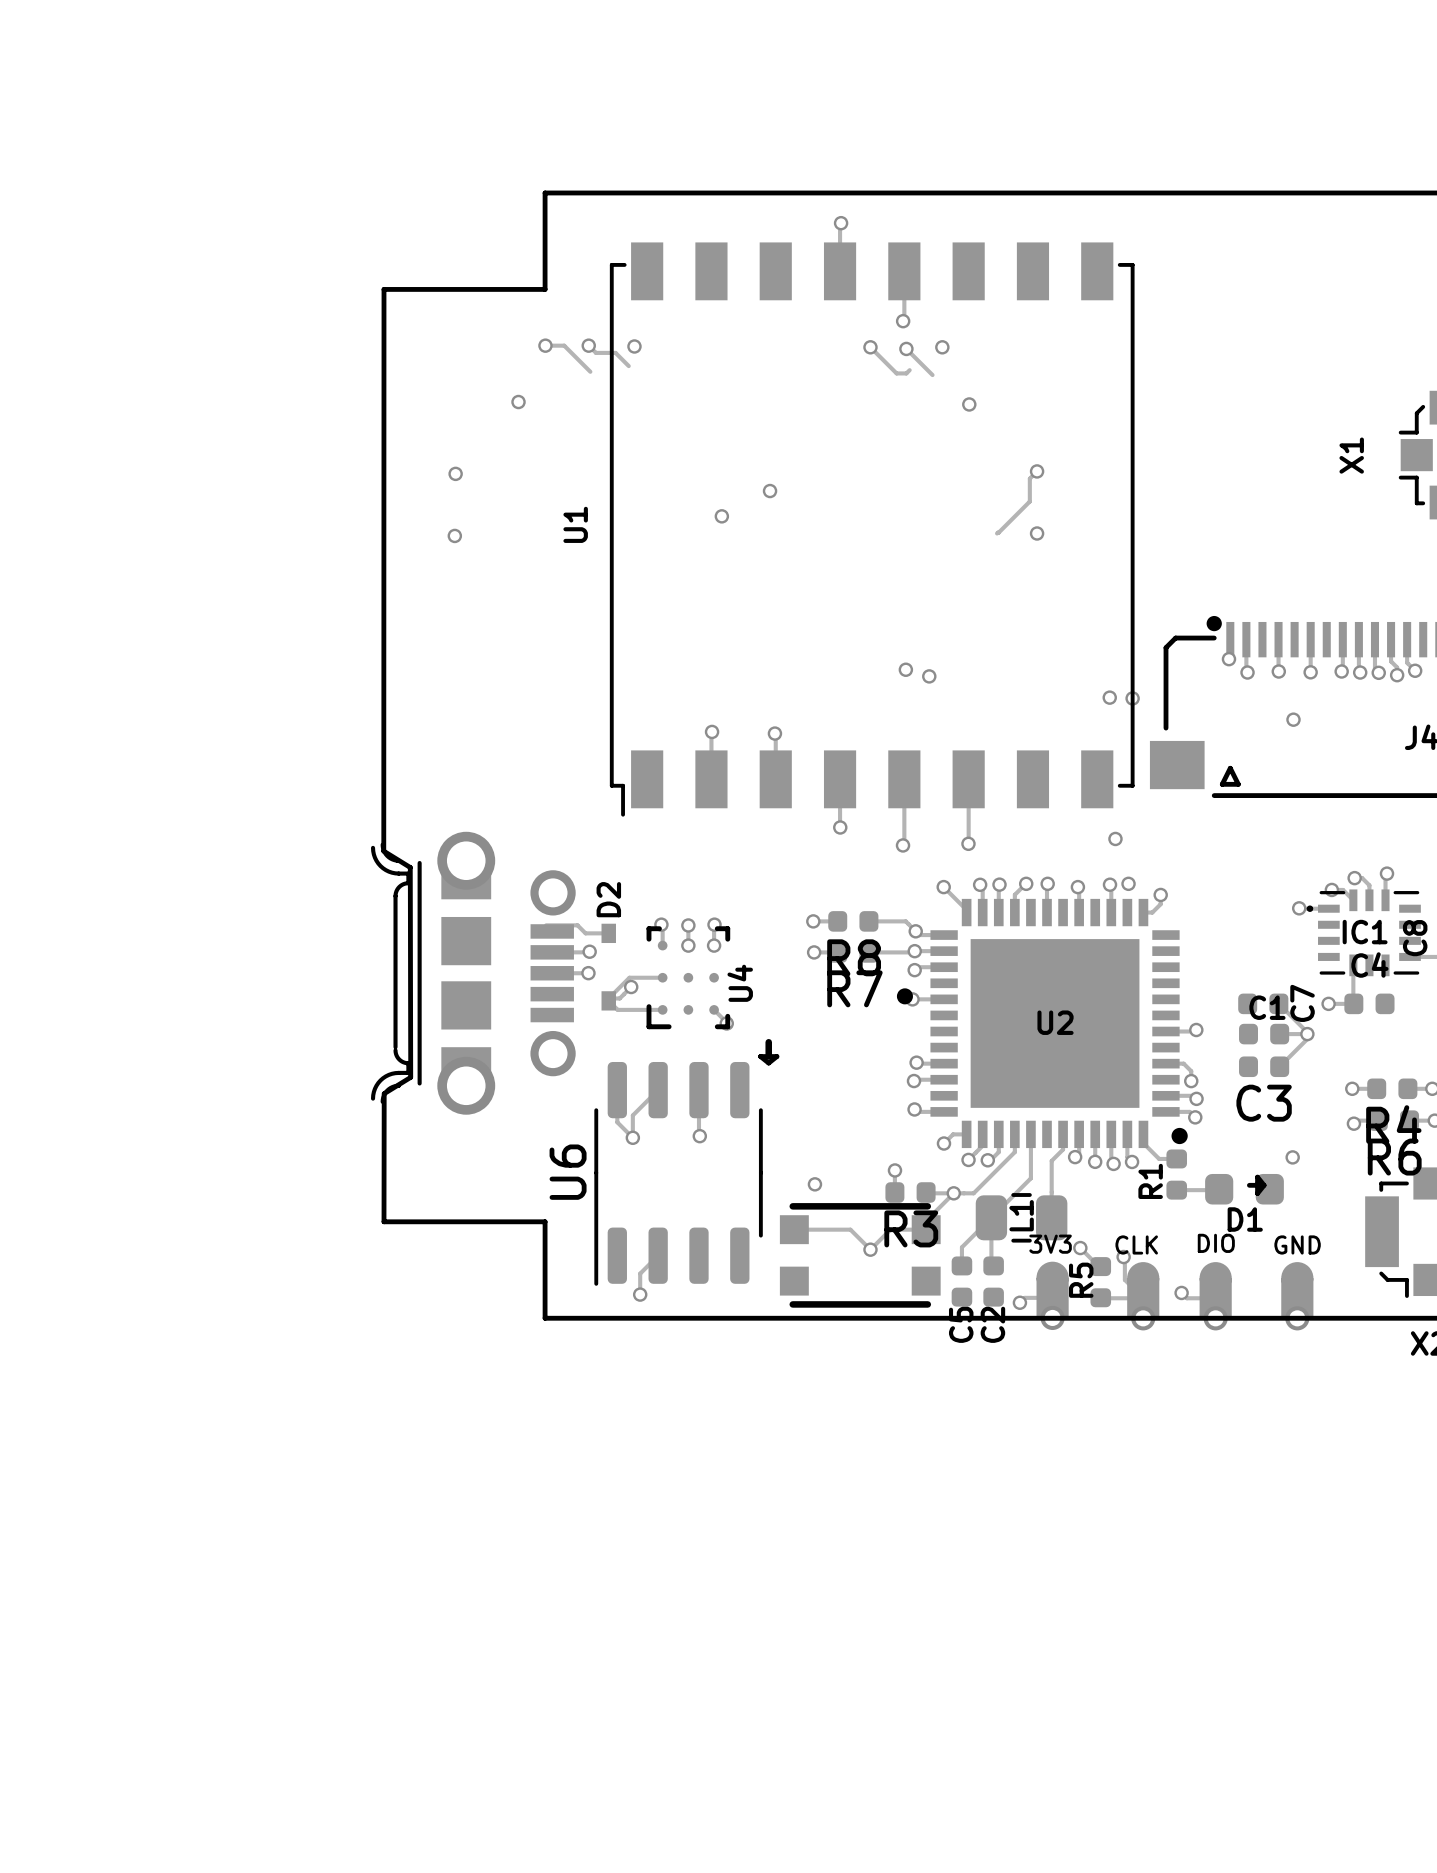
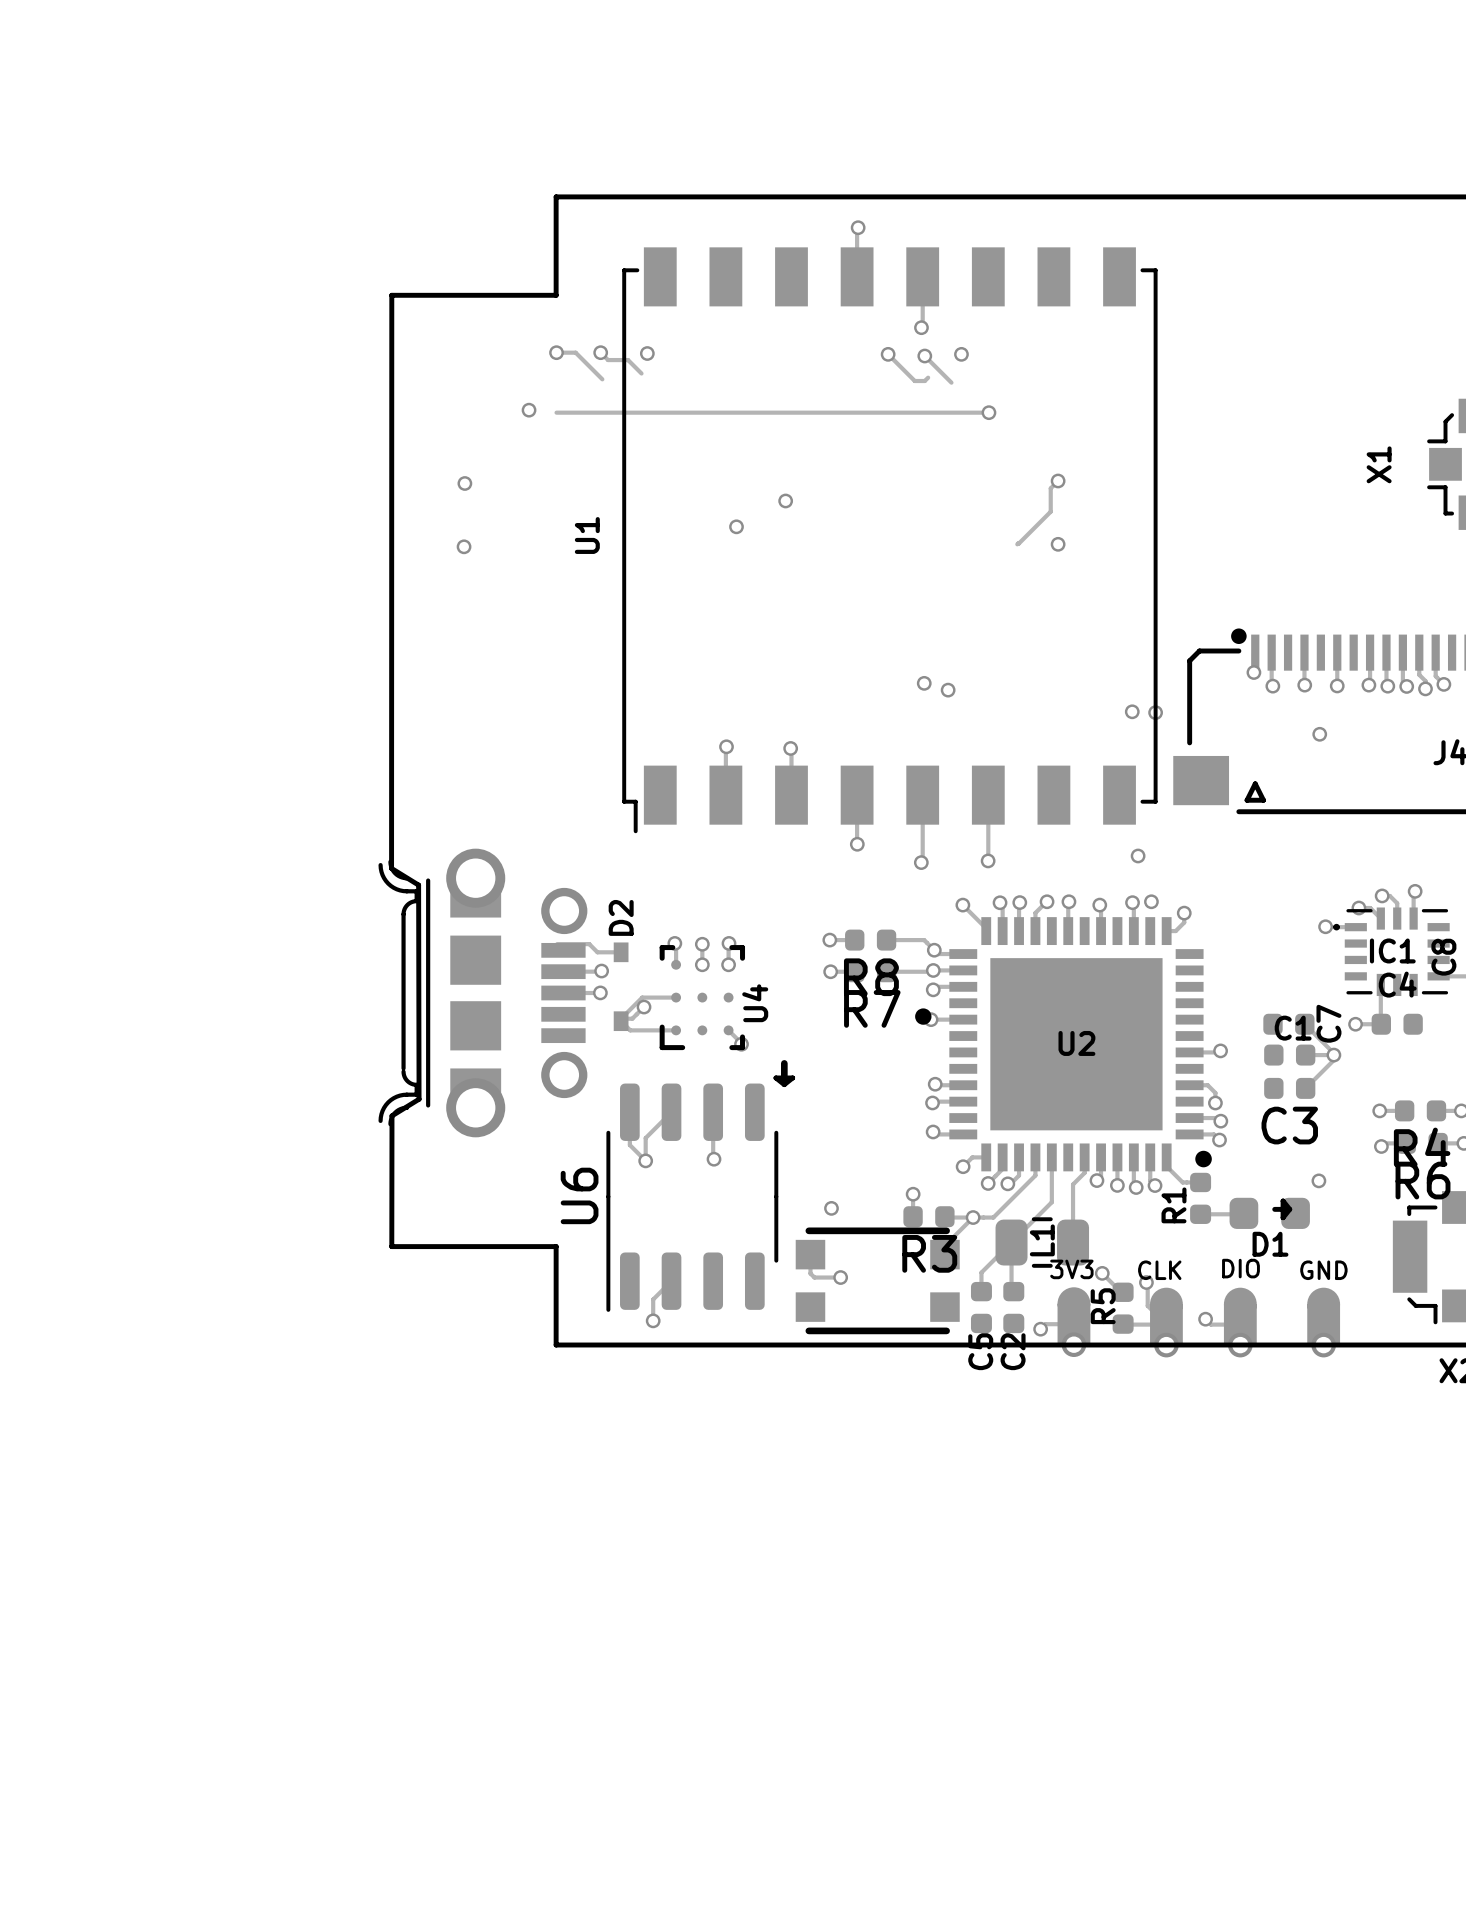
track: none -> (556, 412) (988, 412)
track: (794, 1229) (850, 1229) (870, 1249) (890, 1229) (926, 1229) -> (810, 1254) (810, 1273) (814, 1277) (840, 1277)
via position: (870, 1249) -> (840, 1277)

